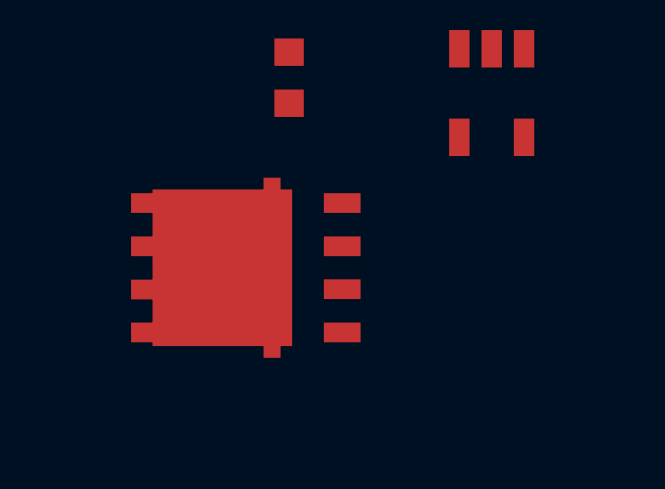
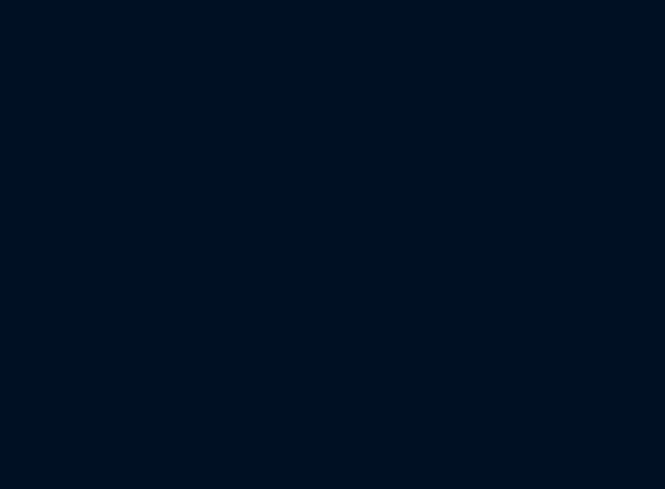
part: (289, 77) -> none
part: (491, 93) -> none
part: (245, 267) -> none

